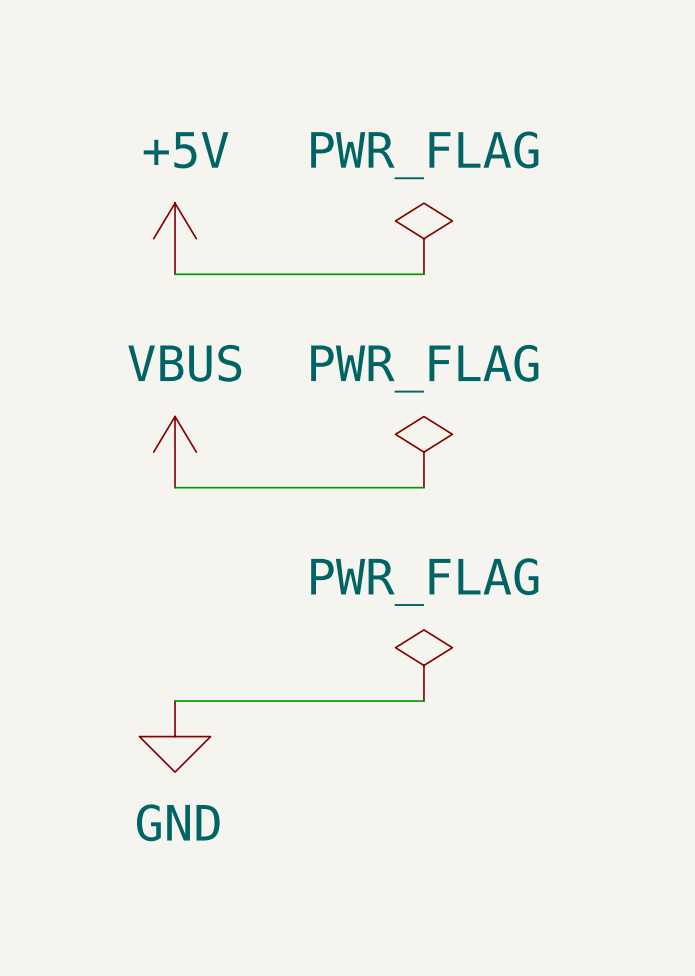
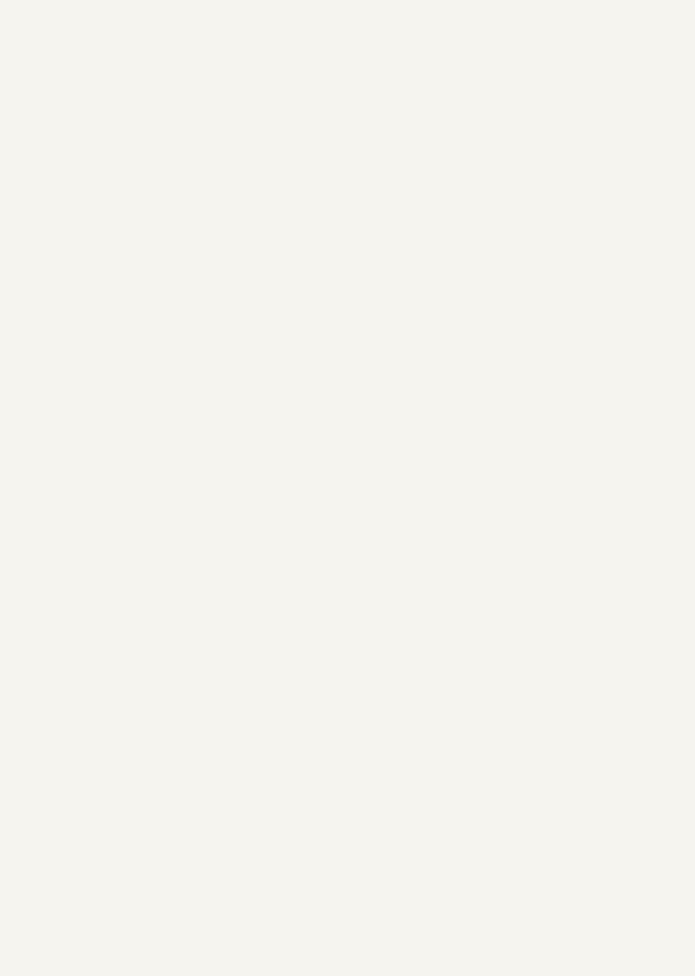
power symbol: +5V (175, 238) -> none
power symbol: PWR_FLAG (423, 238) -> none
wire: (175, 274) (423, 274) -> none
power symbol: VBUS (175, 452) -> none
power symbol: PWR_FLAG (423, 452) -> none
wire: (175, 487) (423, 487) -> none
power symbol: PWR_FLAG (423, 665) -> none
wire: (175, 701) (423, 701) -> none
power symbol: GND (175, 736) -> none

